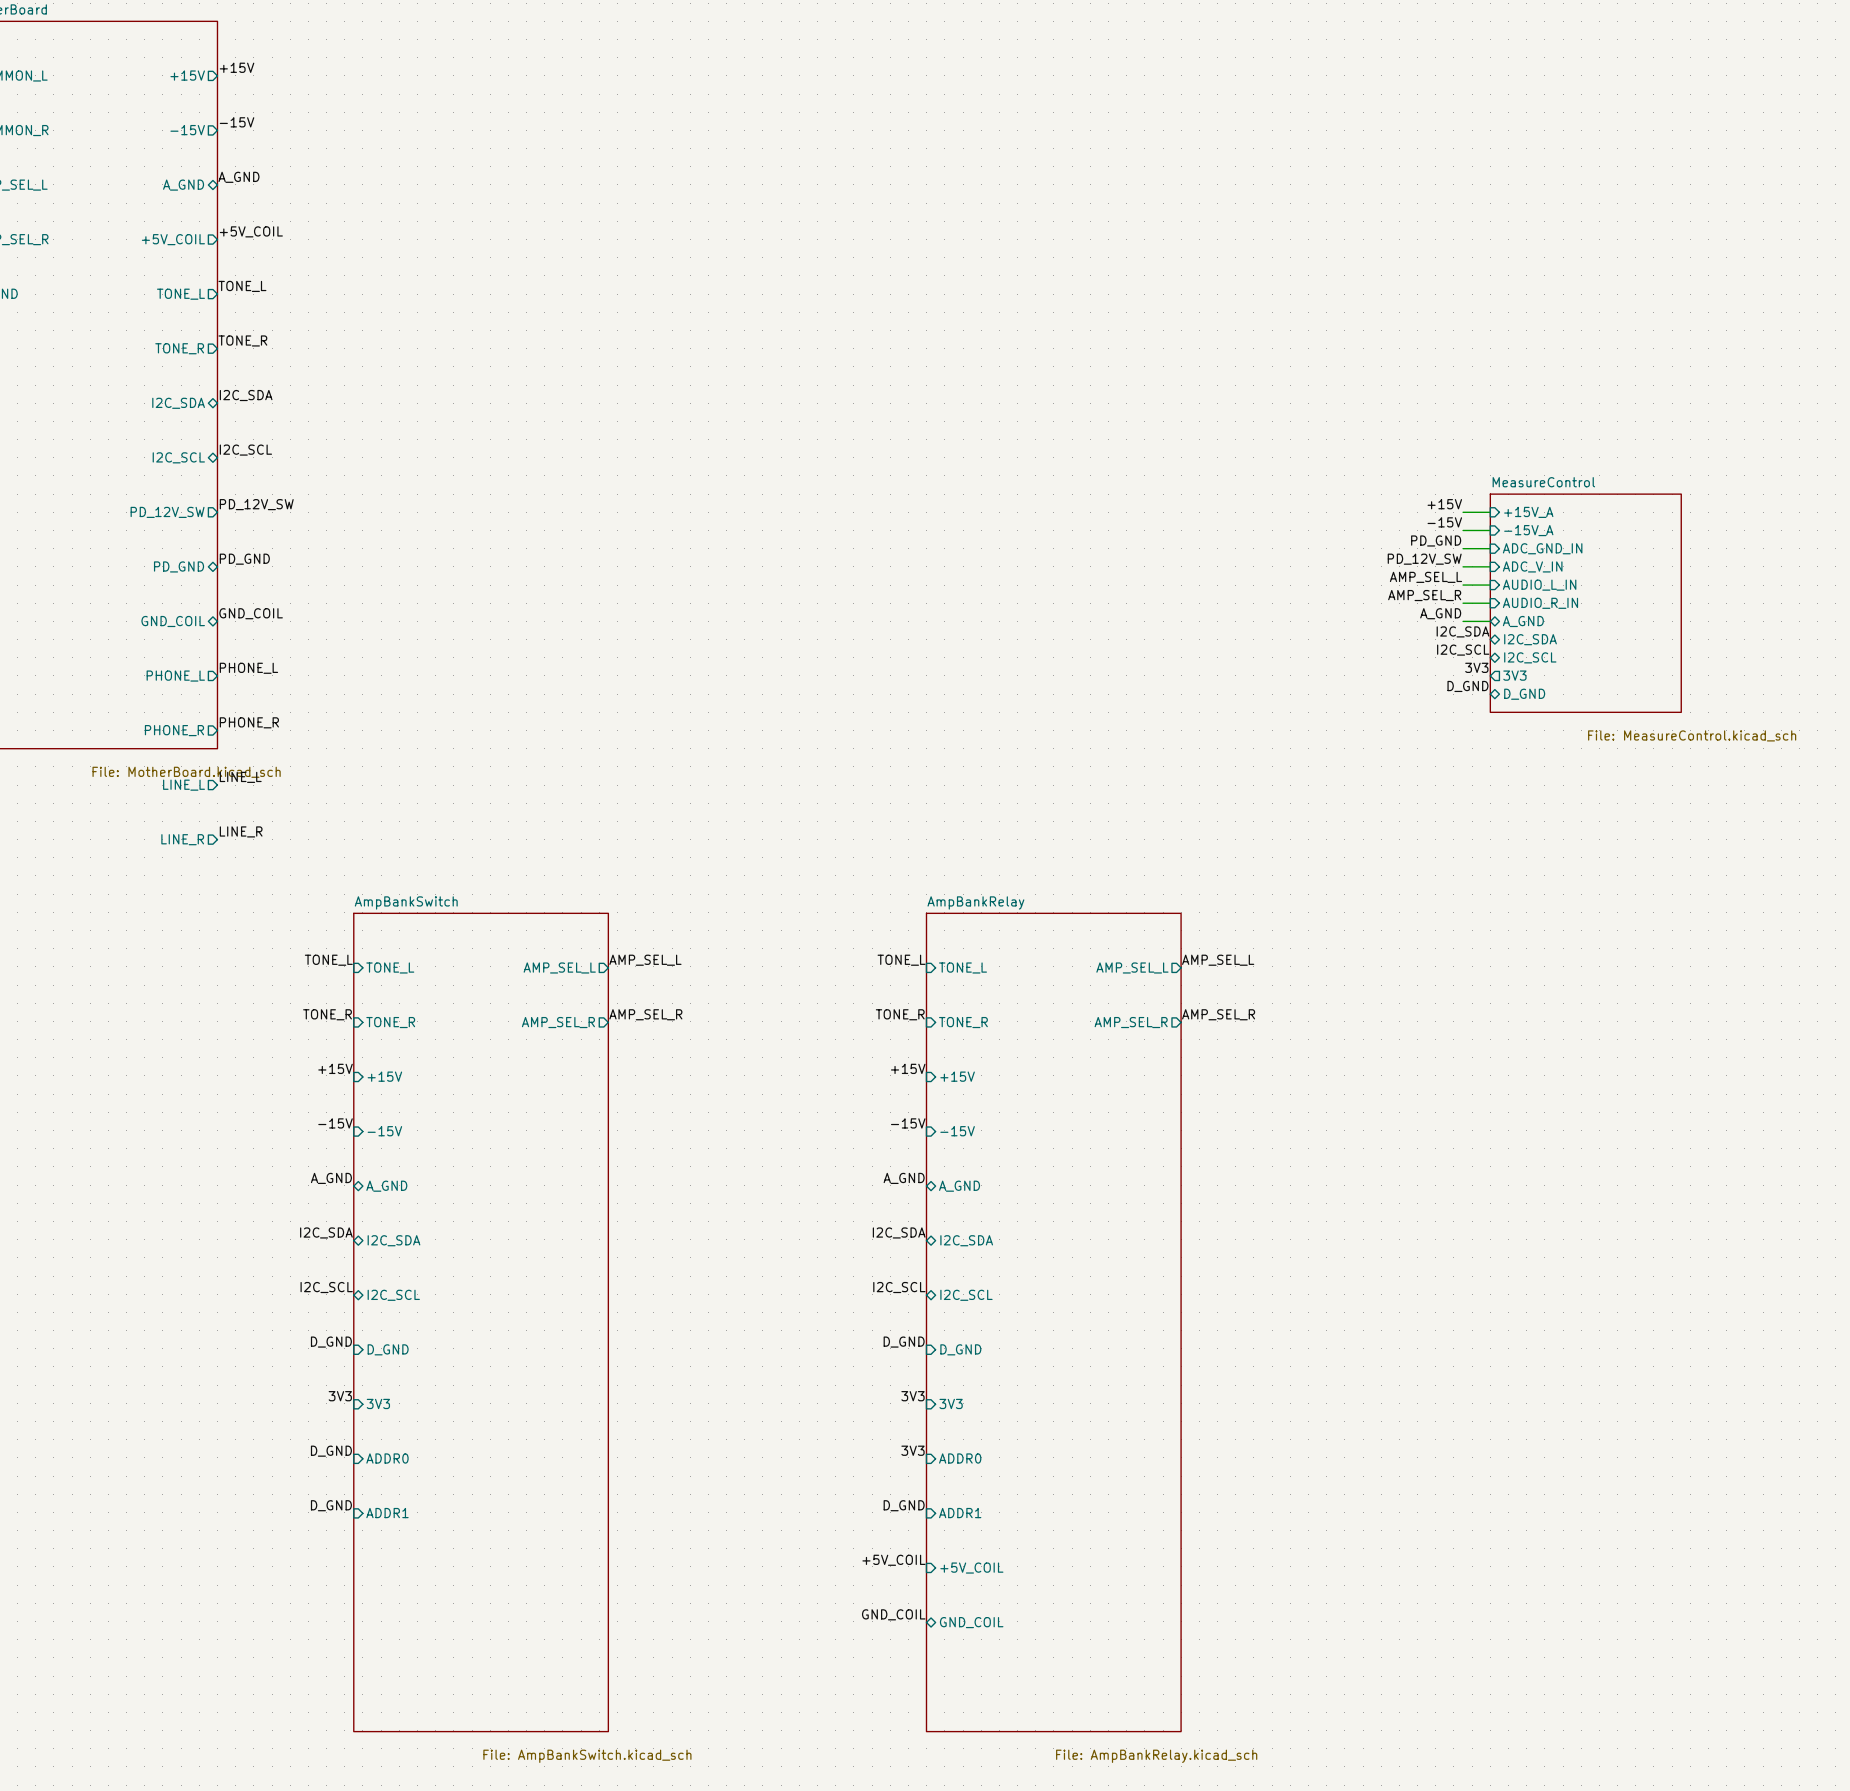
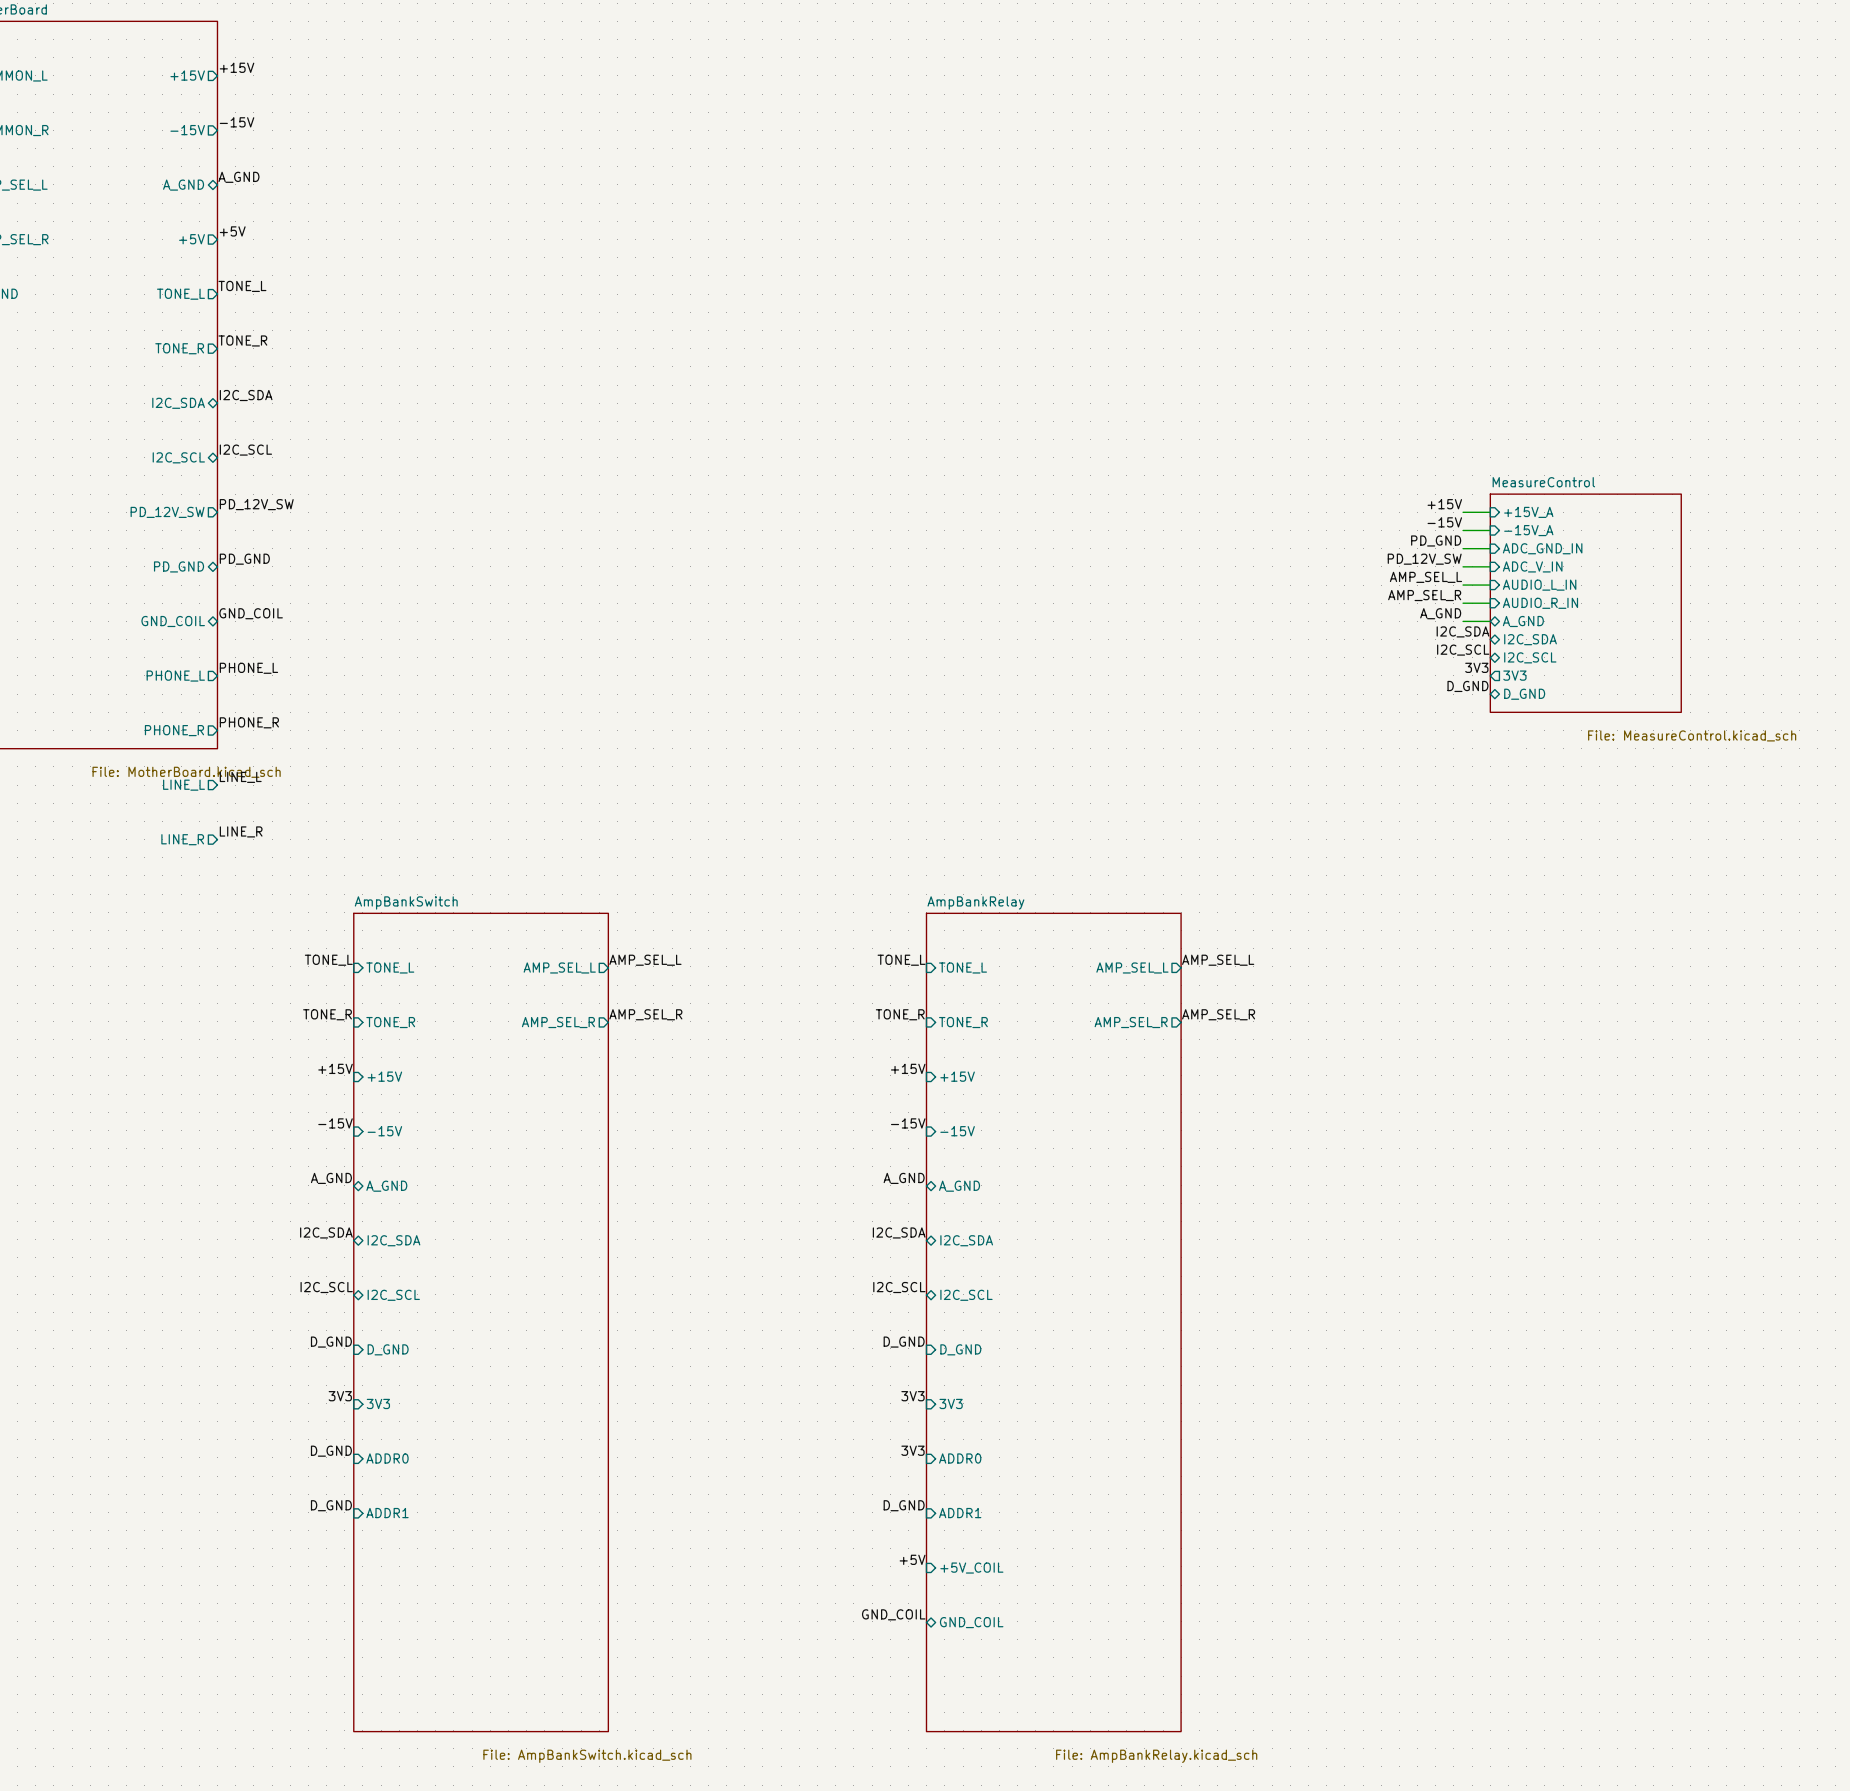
label: +5V_COIL (251, 231) -> +5V (232, 231)
sheet pin: +5V_COIL (173, 239) -> +5V (192, 239)
label: +5V_COIL (893, 1560) -> +5V (912, 1559)

